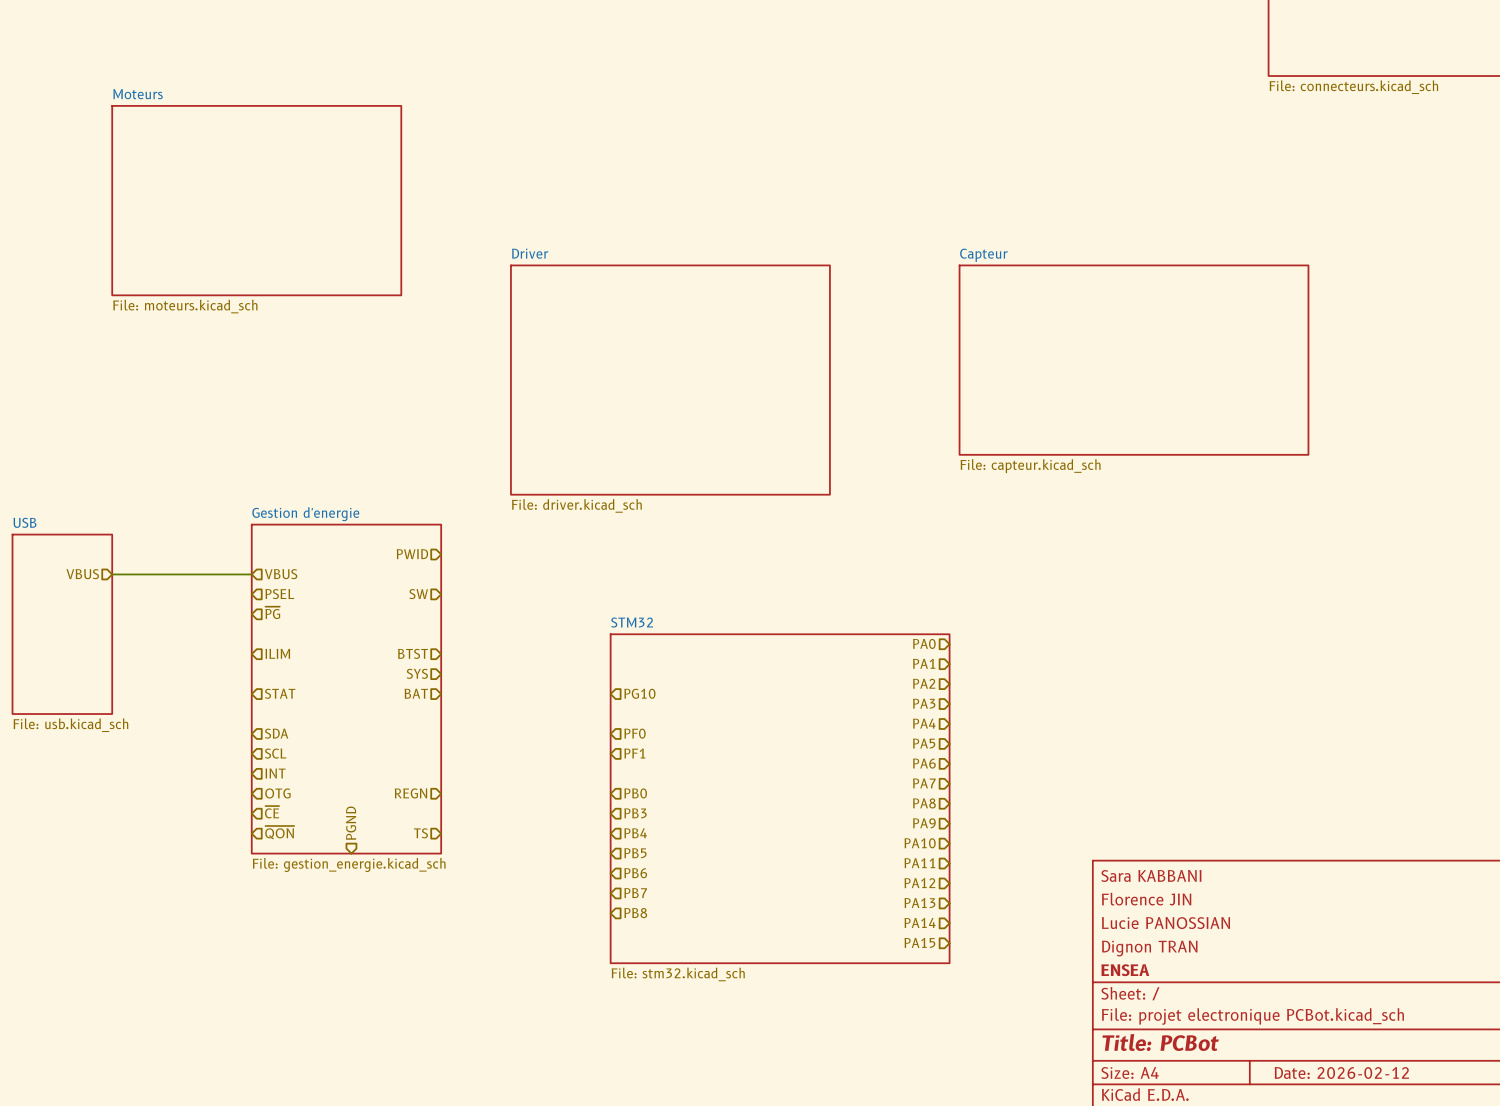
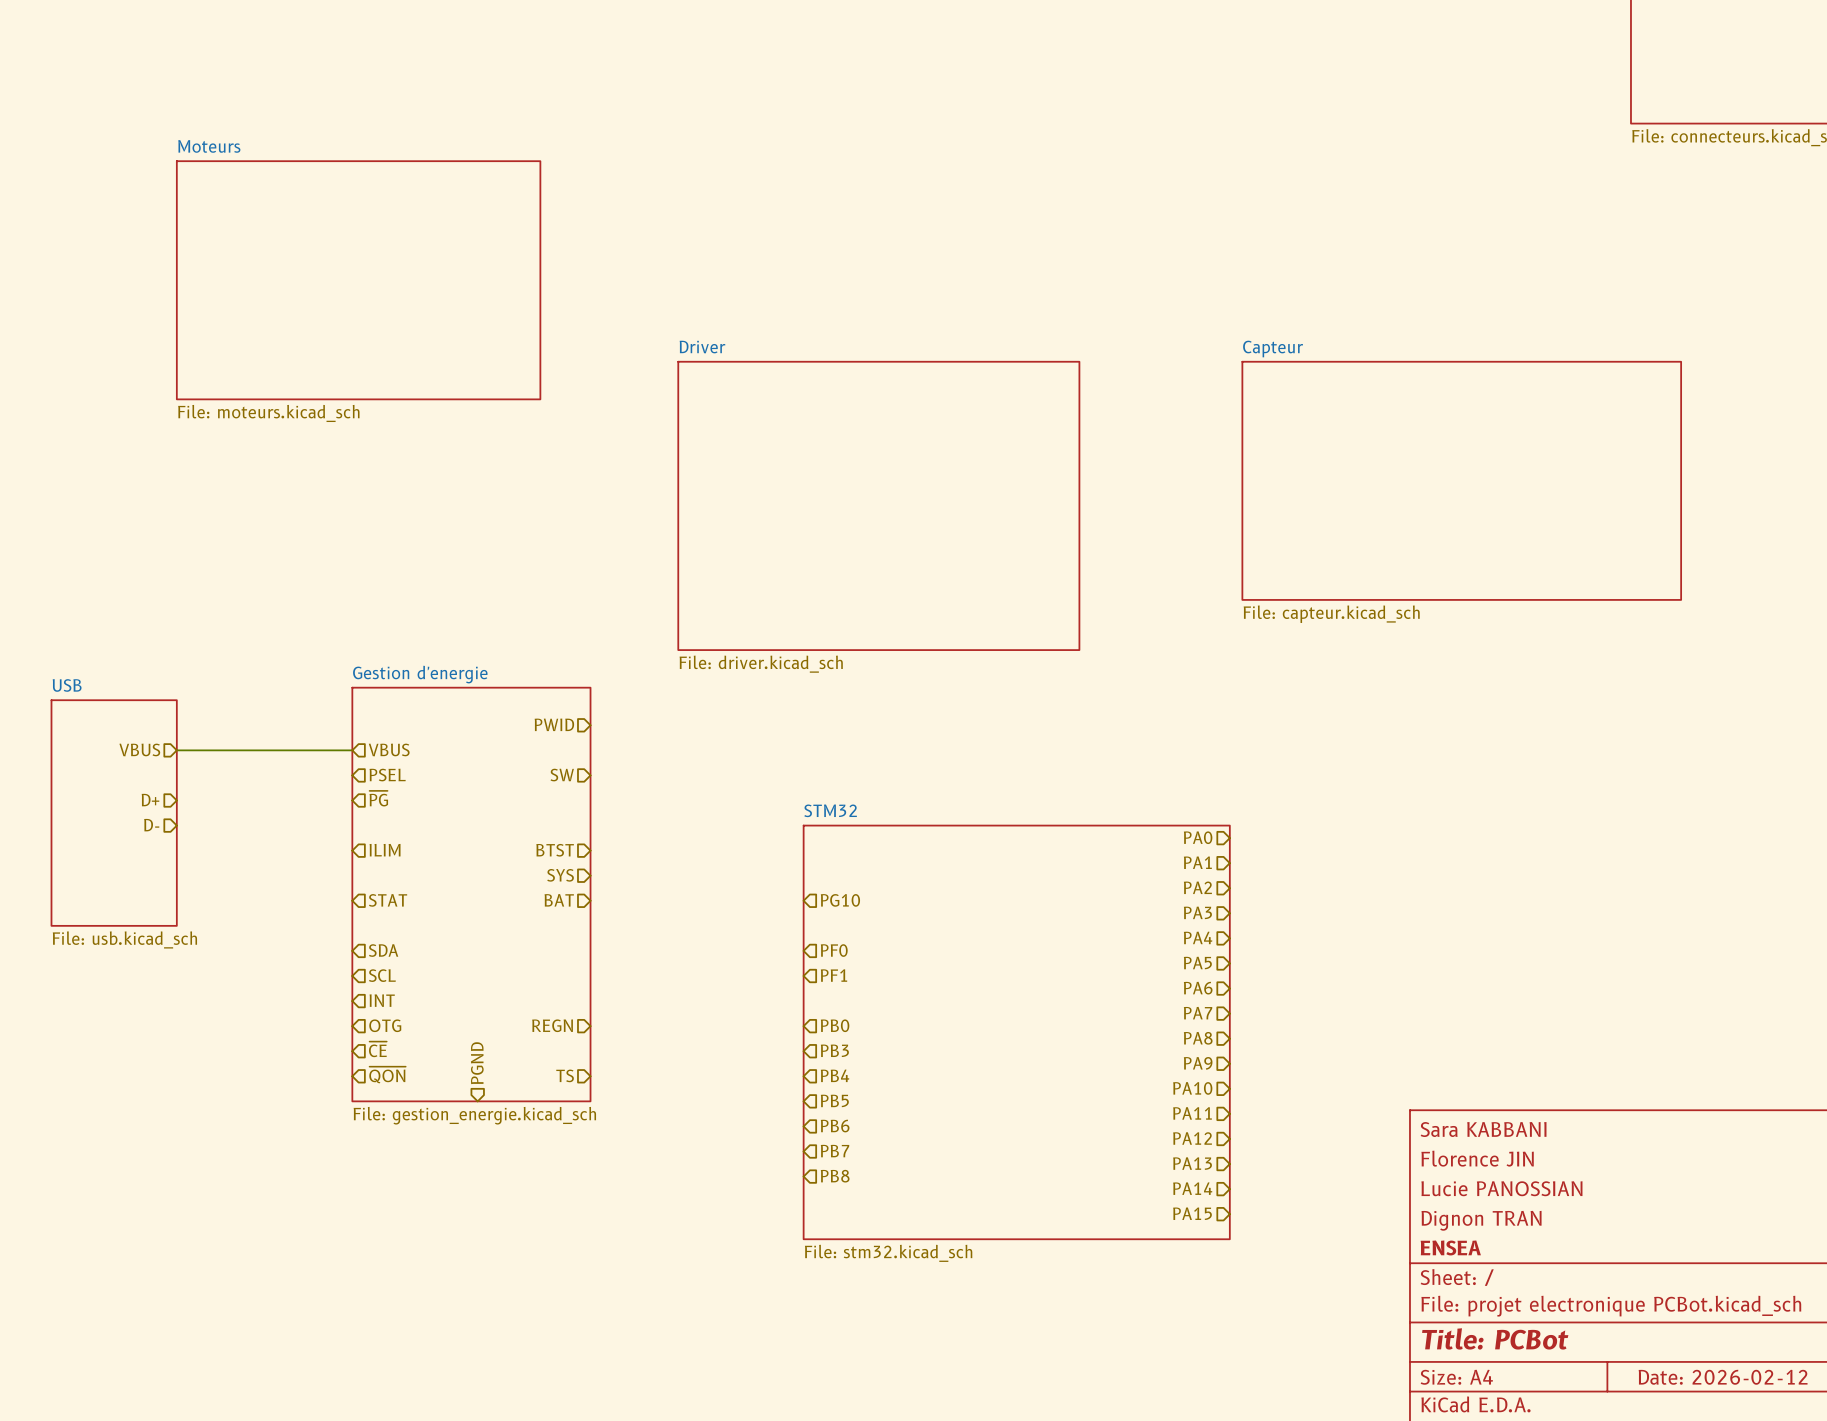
hierarchical label: none -> D+ (150, 800)
hierarchical label: none -> D- (151, 825)

